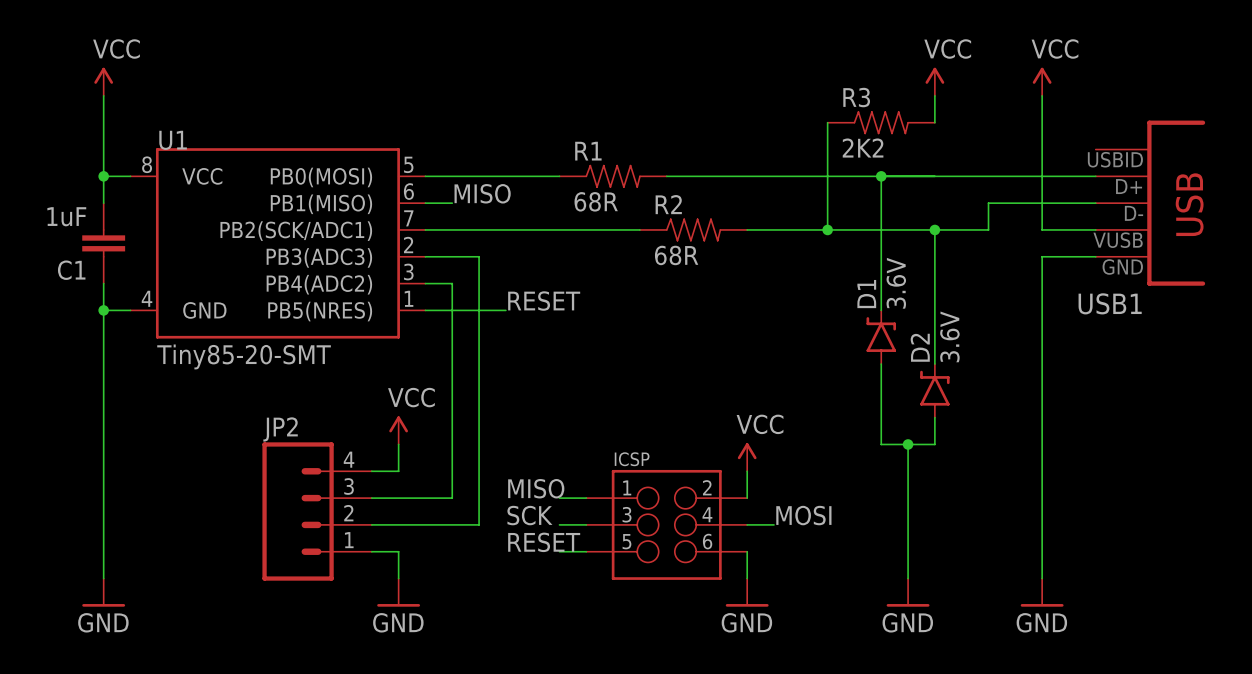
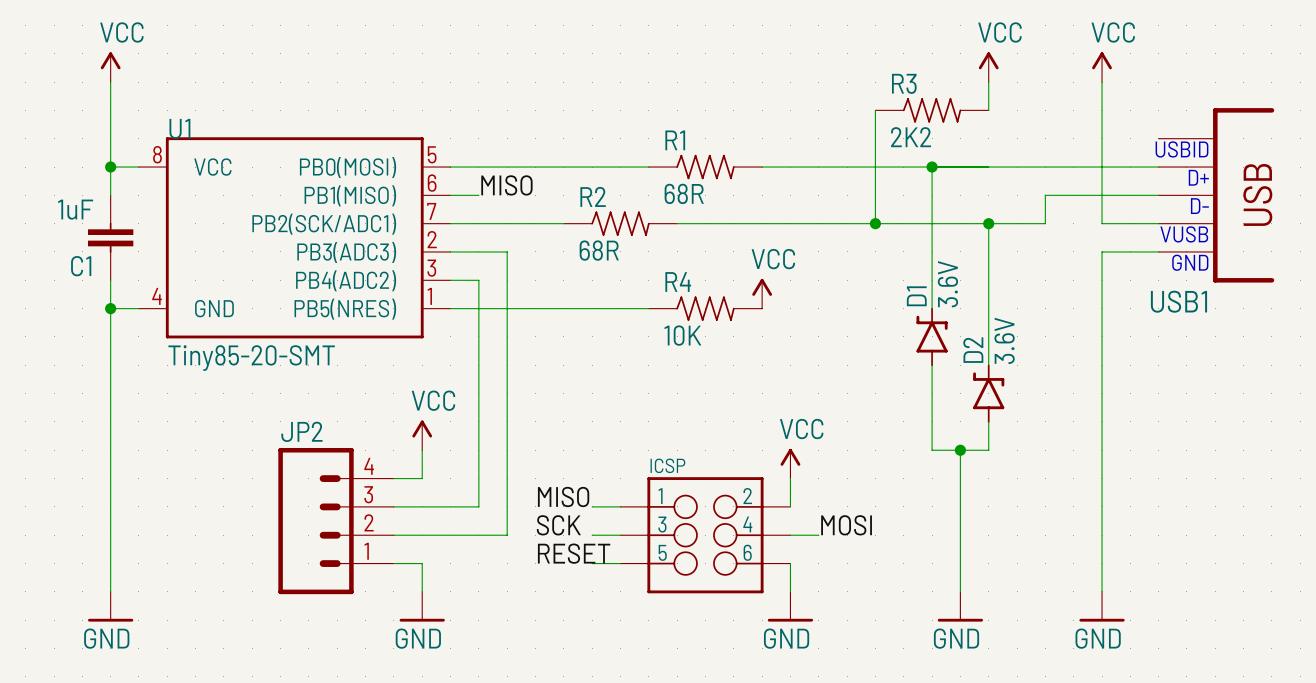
R1 position: (613, 176) -> (705, 167)
R2 position: (693, 229) -> (620, 223)
power symbol: none -> VCC (762, 293)
label: RESET (544, 301) -> none
wire: none -> (535, 308) (648, 308)
R4: none -> 10K (705, 308)

